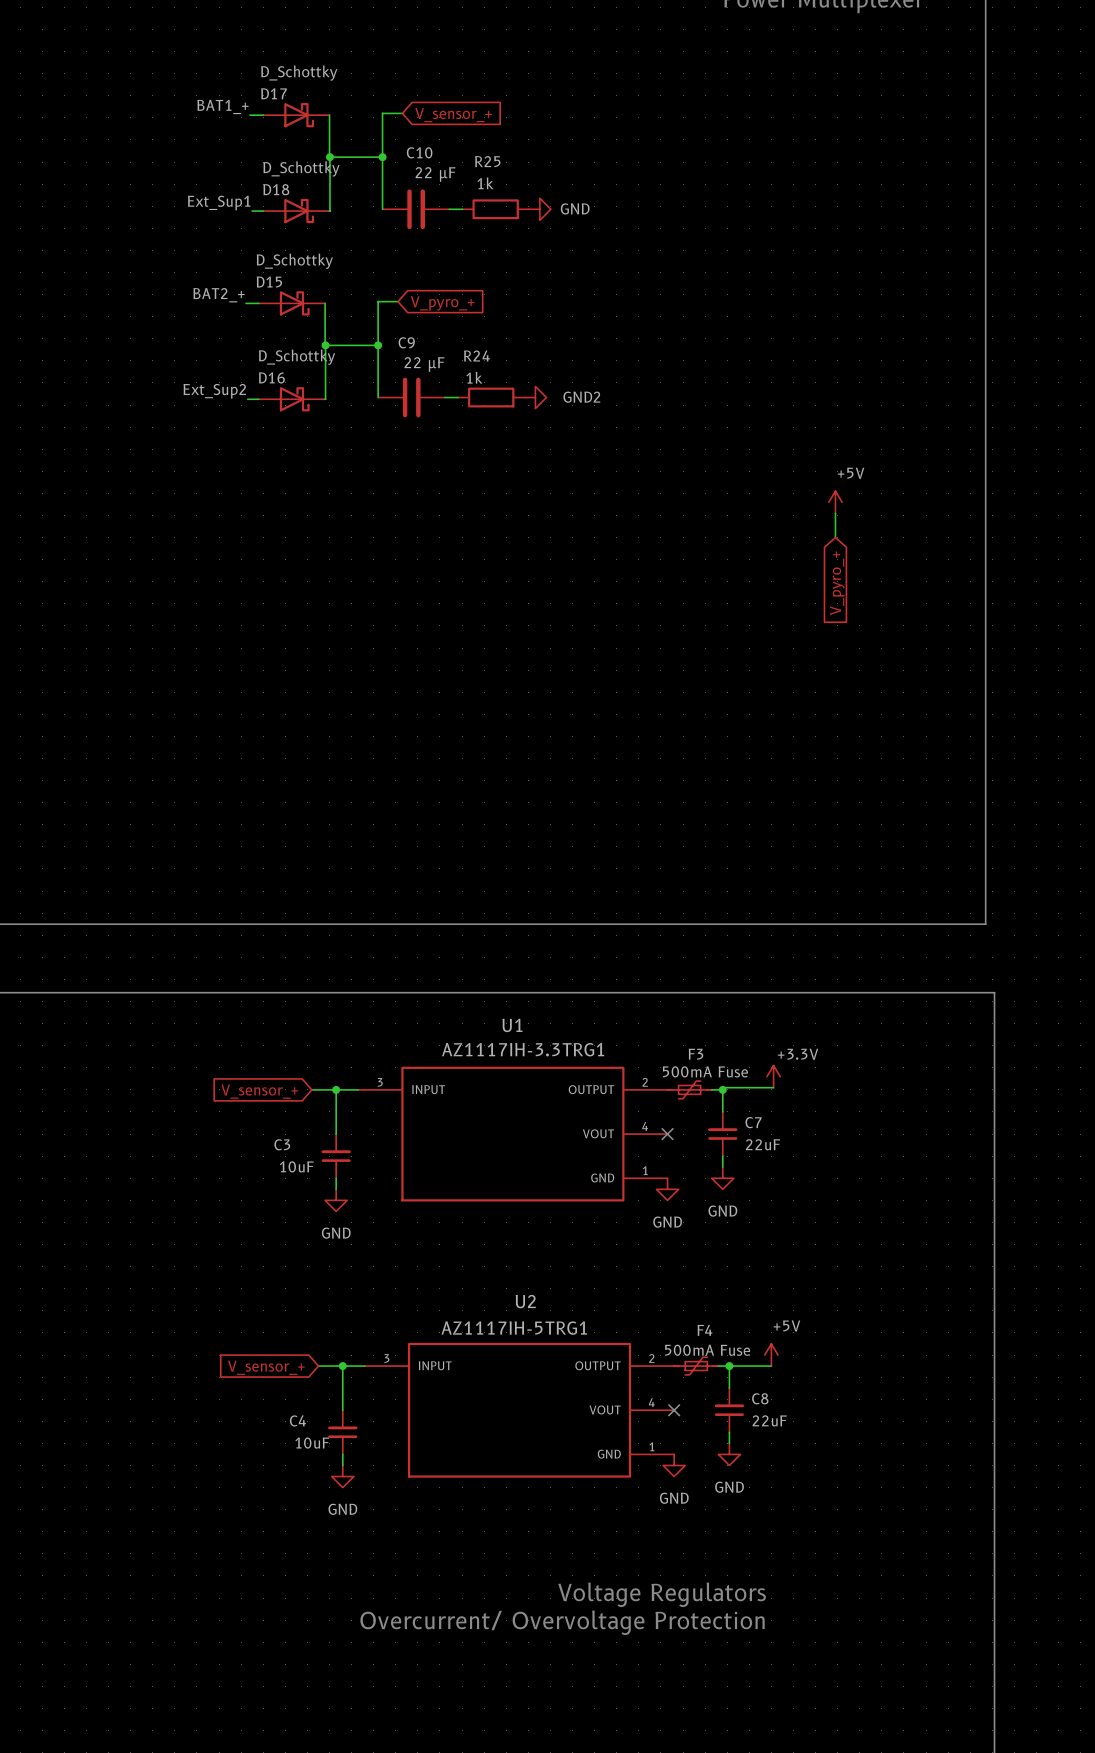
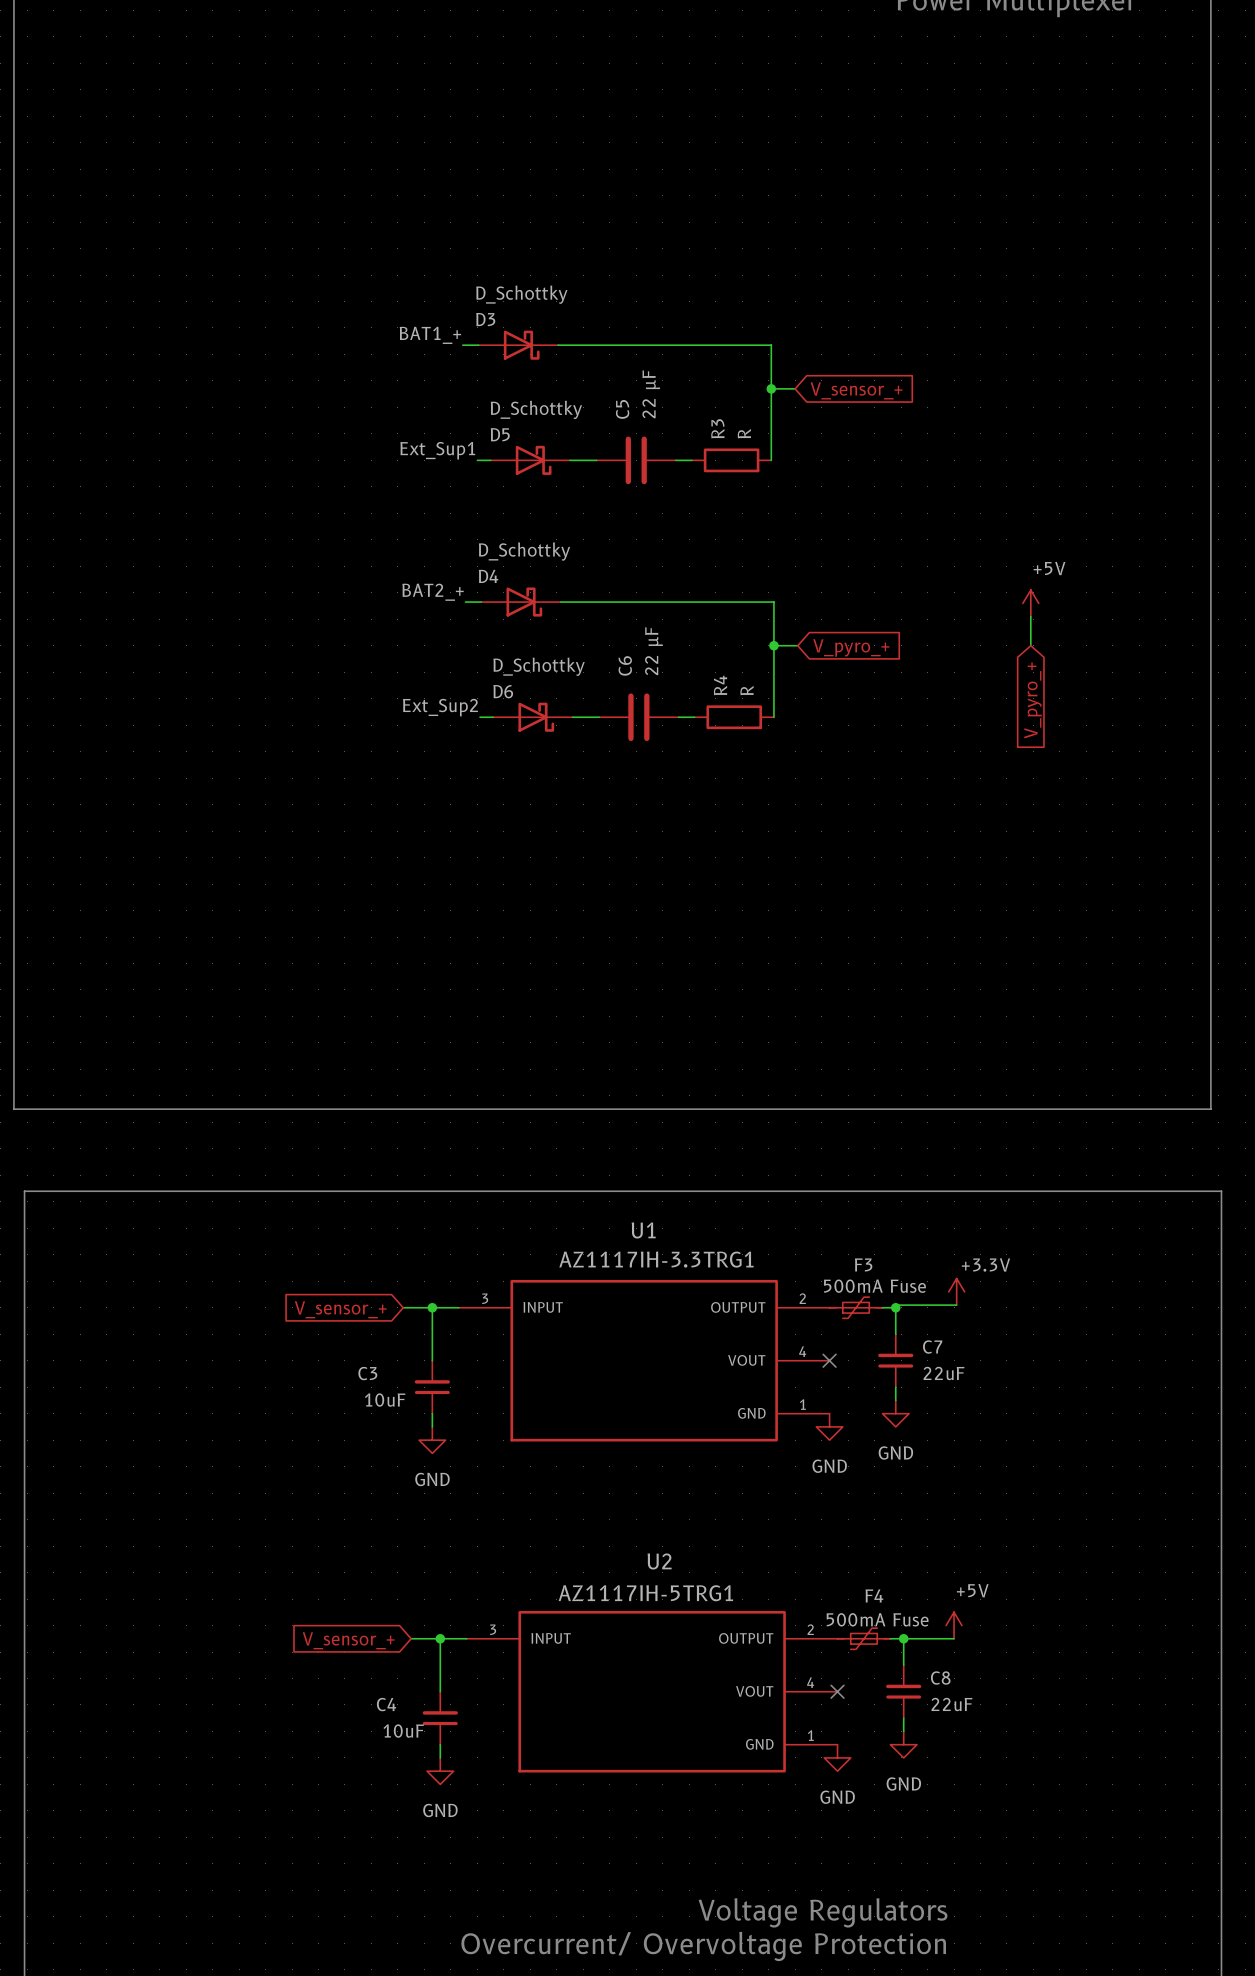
label position: BAT1_+ (222, 106) -> BAT1_+ (430, 335)
wire: (402, 113) (382, 113) (382, 209) -> none
wire: (249, 115) (263, 115) -> none
D17: D_Schottky (296, 115) -> none
wire: (329, 115) (329, 157) (382, 157) -> none
global label: V_sensor_+ (453, 115) -> none
wire: (329, 157) (329, 211) -> none
junction: (329, 157) -> none
junction: (382, 157) -> none
label position: Ext_Sup1 (219, 203) -> Ext_Sup1 (437, 450)
C10: 22 µF (416, 209) -> none
wire: (449, 209) (462, 209) -> (462, 345) (478, 345)
R25: 1k (495, 209) -> none
power symbol: GND (539, 209) -> none
wire: (252, 211) (263, 211) -> none
D18: D_Schottky (296, 211) -> none
D3: none -> D_Schottky (518, 345)
wire: none -> (558, 345) (771, 345) (771, 460)
label: BAT2_+ (218, 295) -> none
wire: (398, 301) (378, 301) (378, 397) -> none
wire: (246, 303) (258, 303) -> none
D15: D_Schottky (291, 303) -> none
wire: (325, 303) (325, 345) (378, 345) -> none
global label: V_pyro_+ (442, 303) -> none
wire: none -> (771, 388) (795, 388)
junction: none -> (771, 388)
global label: none -> V_sensor_+ (856, 390)
wire: (325, 345) (325, 399) -> none
junction: (325, 345) -> none
junction: (378, 345) -> none
D5: none -> D_Schottky (530, 460)
wire: none -> (570, 460) (596, 460)
C5: none -> 22 µF (636, 460)
R3: none -> R (731, 460)
label: Ext_Sup2 (214, 391) -> none
C9: 22 µF (411, 397) -> none
wire: (444, 397) (458, 397) -> (675, 460) (691, 460)
R24: 1k (491, 397) -> none
power symbol: GND2 (535, 397) -> none
wire: (247, 399) (258, 399) -> (477, 460) (490, 460)
D16: D_Schottky (291, 399) -> none
label: none -> BAT2_+ (433, 592)
wire: none -> (465, 602) (481, 602)
D4: none -> D_Schottky (521, 602)
wire: none -> (560, 602) (773, 602) (773, 717)
wire: none -> (773, 645) (797, 645)
junction: none -> (773, 645)
global label: none -> V_pyro_+ (851, 647)
label: none -> Ext_Sup2 (440, 707)
wire: none -> (480, 717) (493, 717)
D6: none -> D_Schottky (532, 717)
wire: none -> (572, 717) (599, 717)
C6: none -> 22 µF (638, 717)
wire: none -> (678, 717) (694, 717)
R4: none -> R (734, 717)

